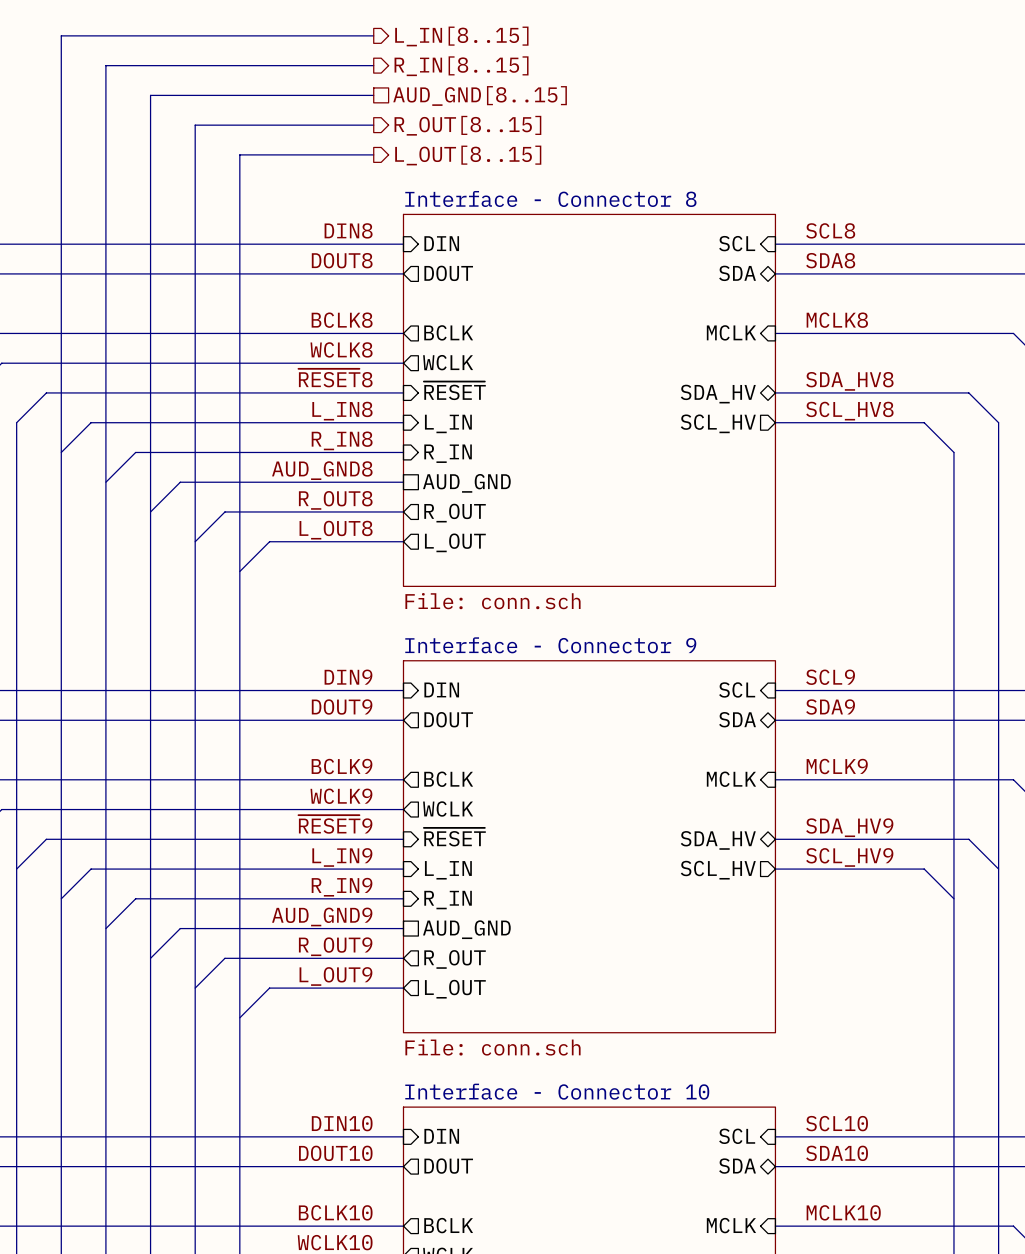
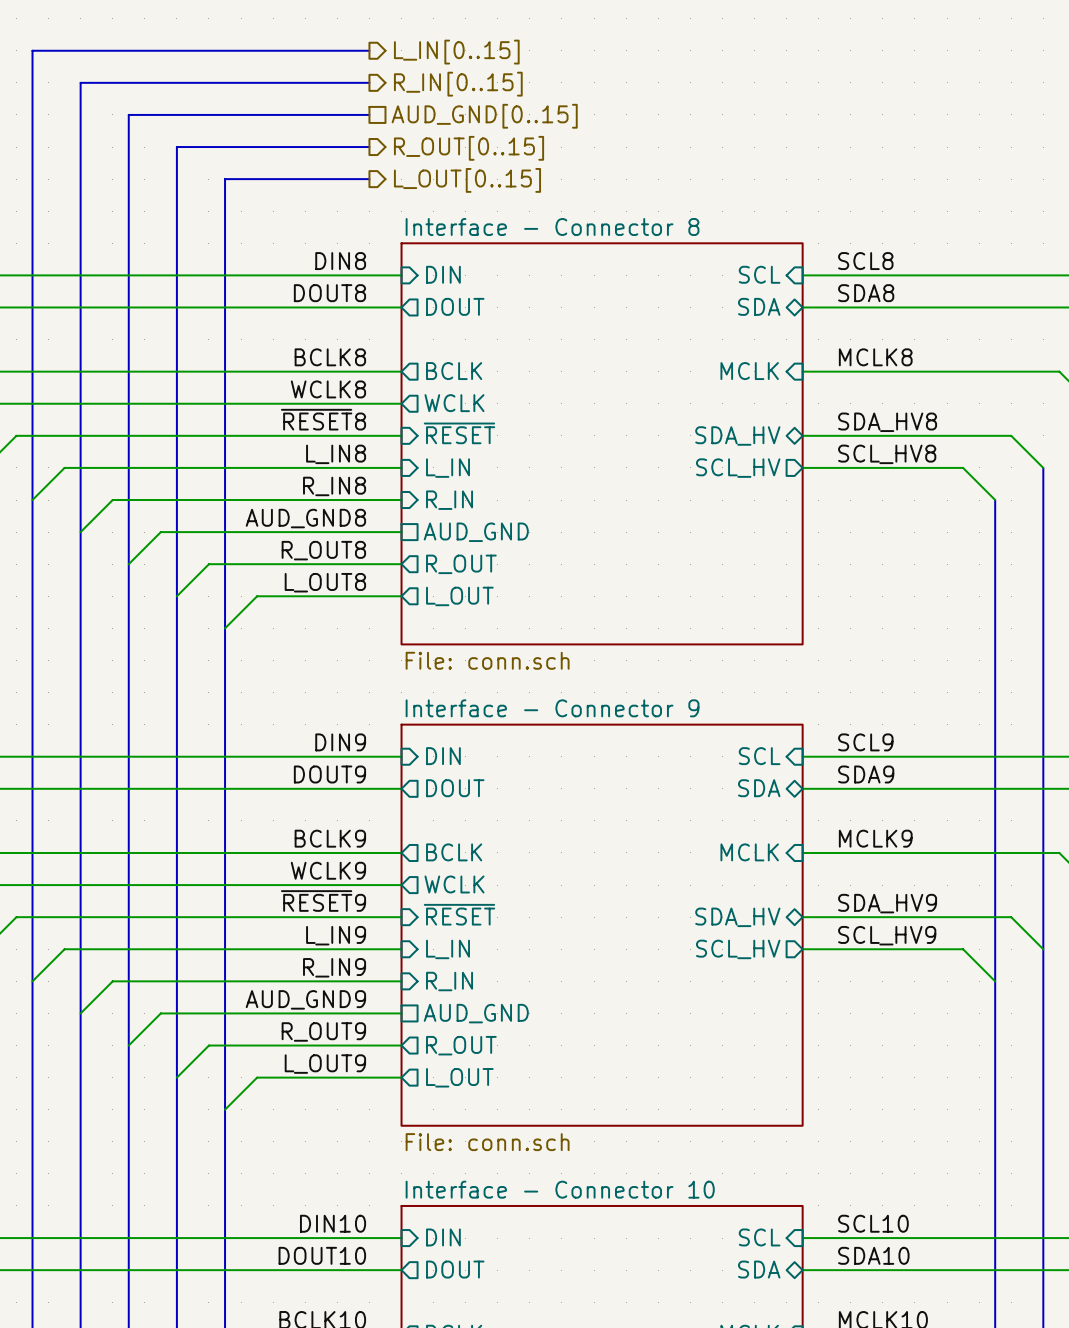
hierarchical label: L_IN[8..15] (461, 36) -> L_IN[0..15] (456, 52)
hierarchical label: R_IN[8..15] (461, 66) -> R_IN[0..15] (458, 84)
hierarchical label: AUD_GND[8..15] (480, 95) -> AUD_GND[0..15] (484, 116)
hierarchical label: R_OUT[8..15] (467, 125) -> R_OUT[0..15] (469, 148)
hierarchical label: L_OUT[8..15] (468, 155) -> L_OUT[0..15] (467, 180)

